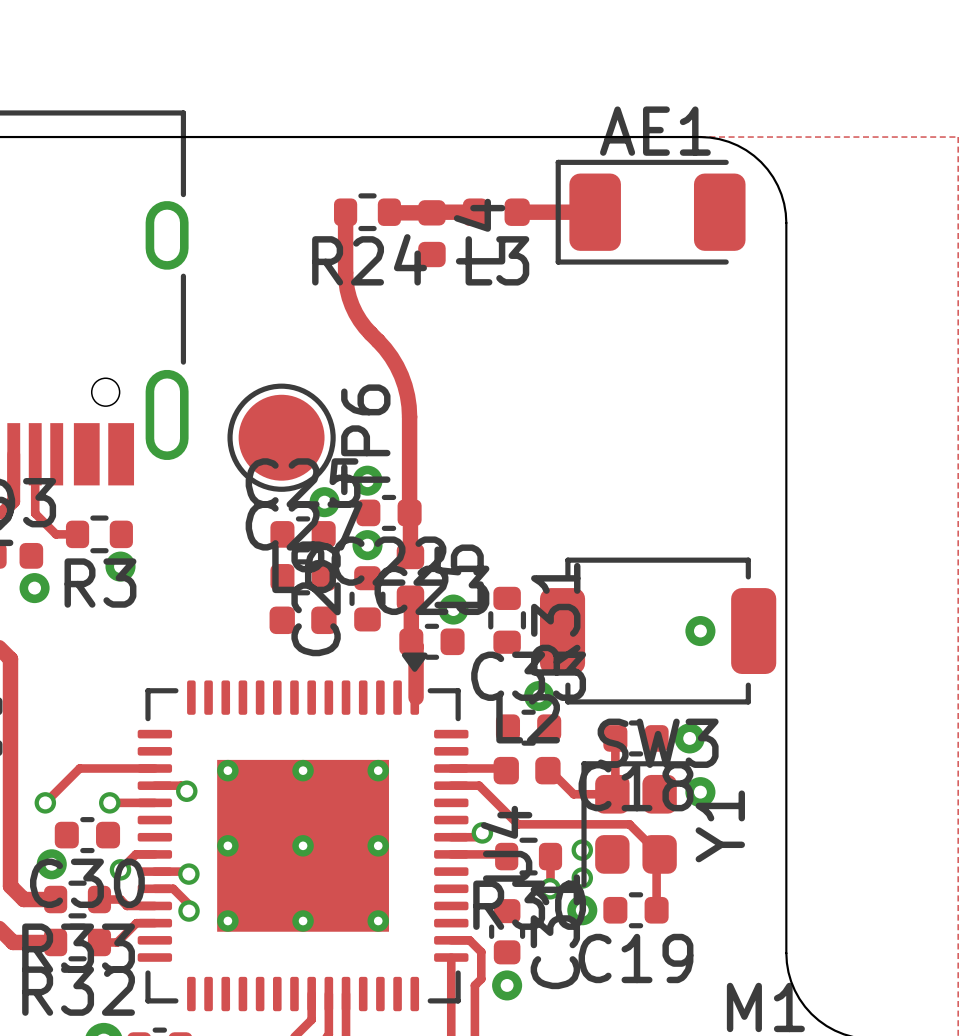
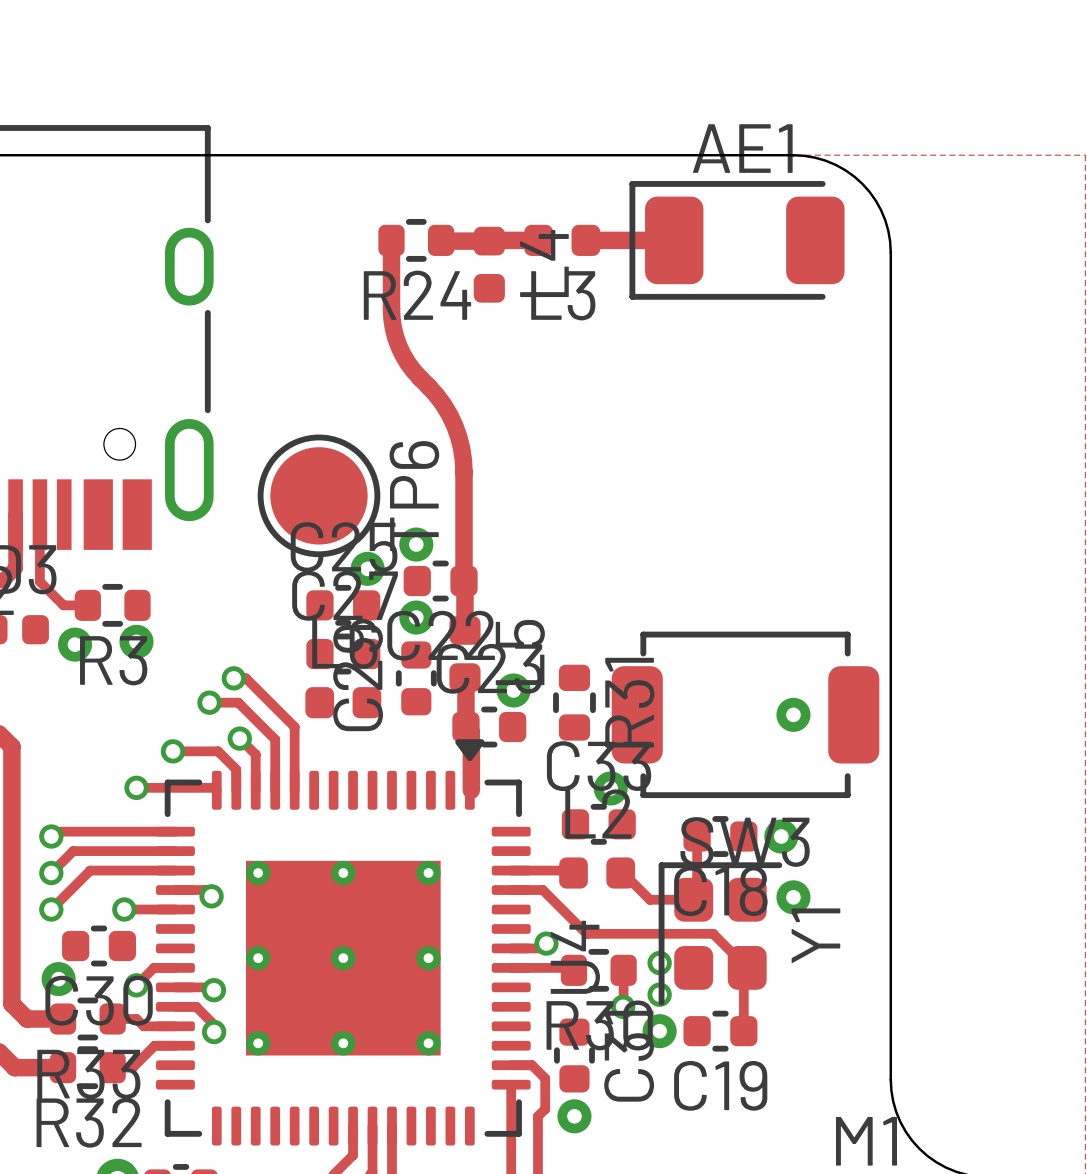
via position: (34, 588) -> (75, 644)
track: none -> (233, 678) (245, 678) (294, 727) (294, 790)
via: none -> (233, 678)
track: none -> (209, 702) (238, 702) (275, 739) (275, 790)
via: none -> (209, 702)
track: none -> (239, 738) (255, 754) (255, 790)
via: none -> (239, 738)
track: none -> (173, 751) (218, 751) (236, 769) (236, 790)
via: none -> (173, 751)
track: none -> (136, 787) (214, 787) (216, 790)
via: none -> (136, 787)
track: none -> (175, 831) (56, 831) (51, 836)
via: none -> (51, 836)
track: none -> (175, 851) (73, 851) (51, 873)
via: none -> (51, 873)

